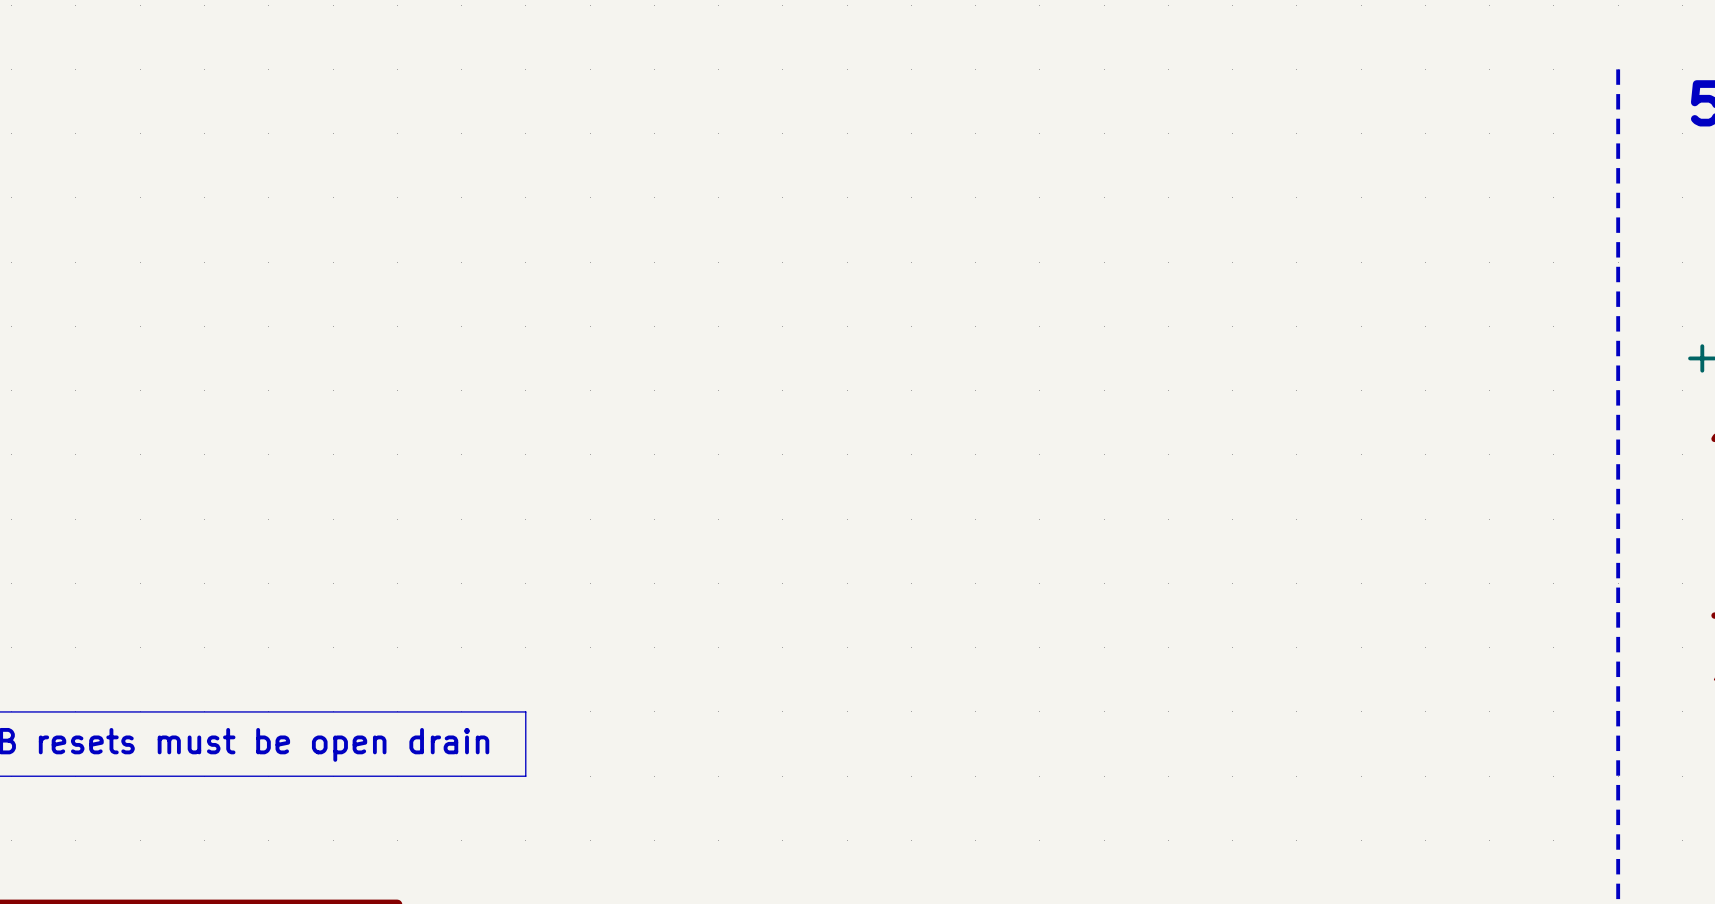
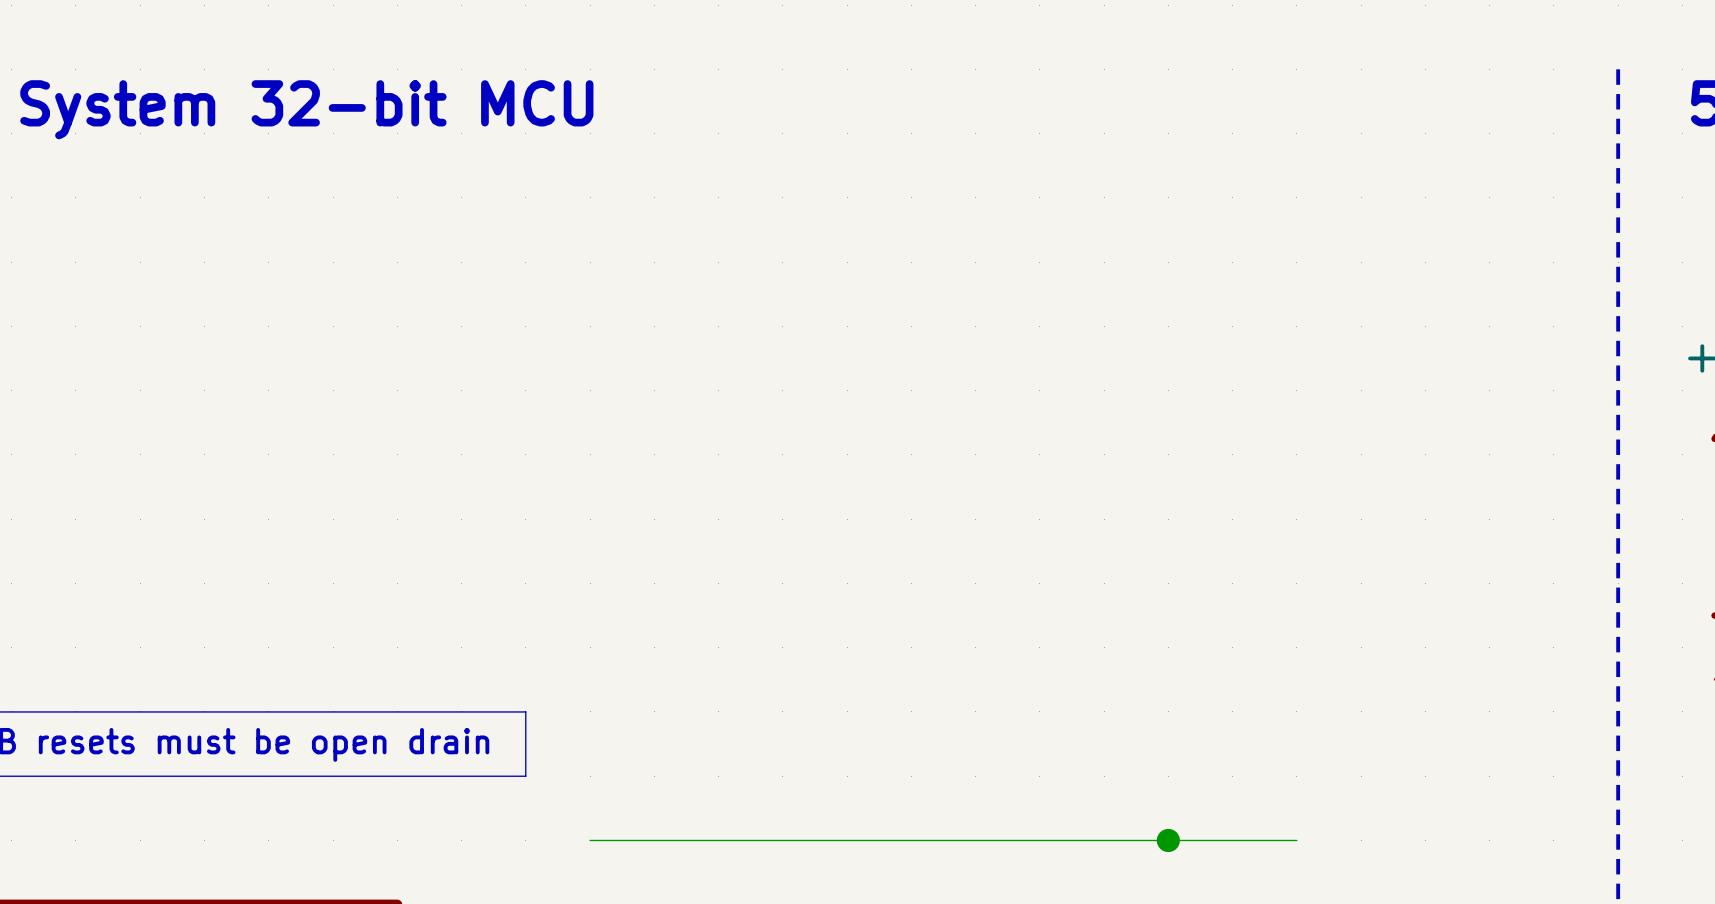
text: none -> System 32-bit MCU (306, 109)
wire: none -> (590, 840) (1296, 840)
junction: none -> (1168, 840)

